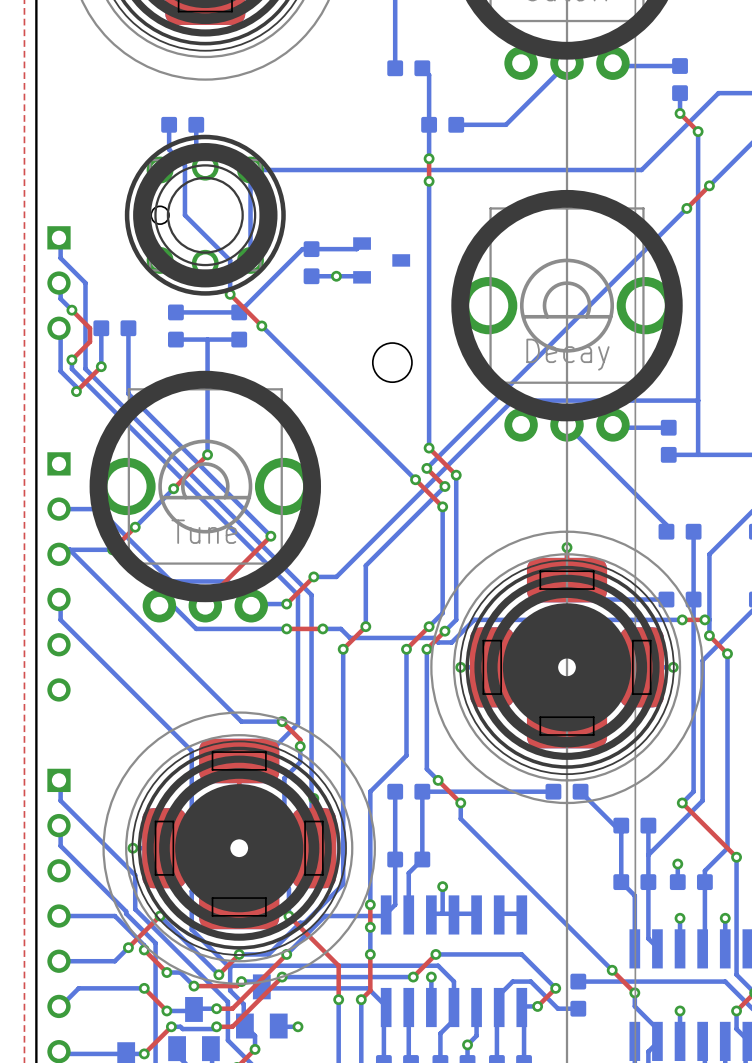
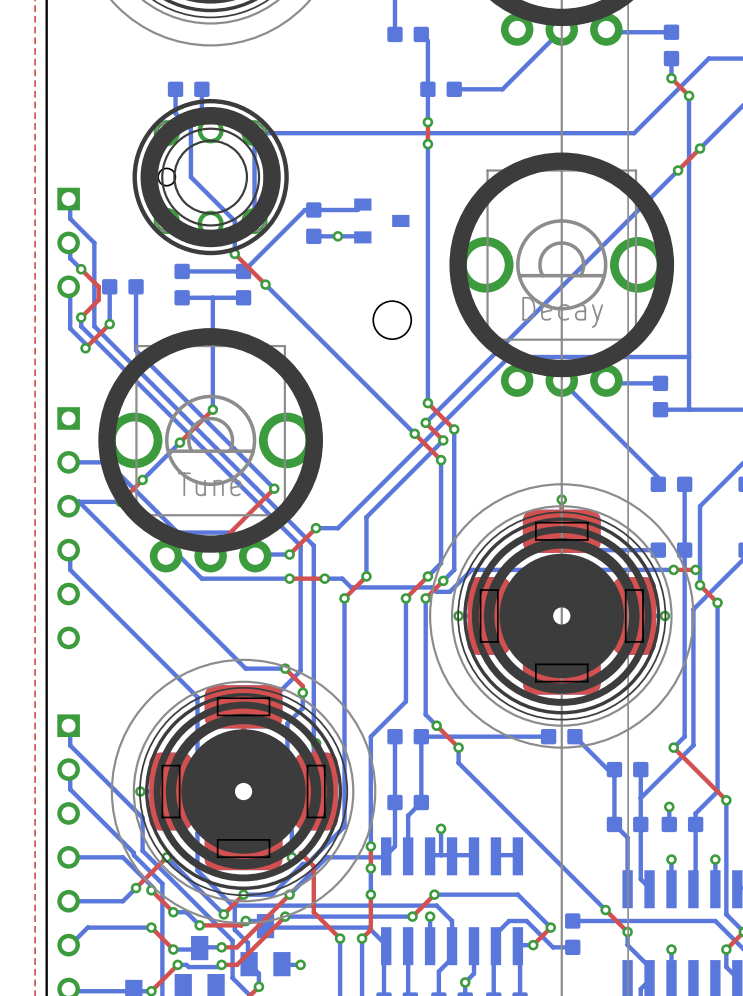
top track: (288, 916) (338, 965) (338, 999) -> (300, 852) (313, 866) (313, 912) (340, 938)

